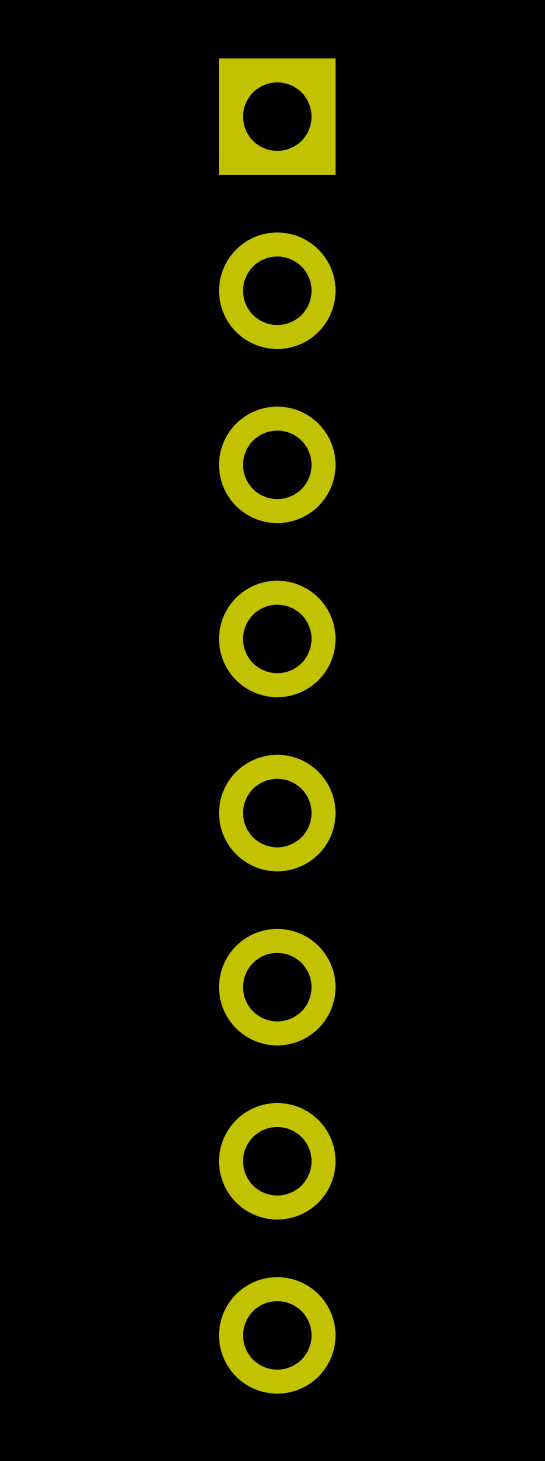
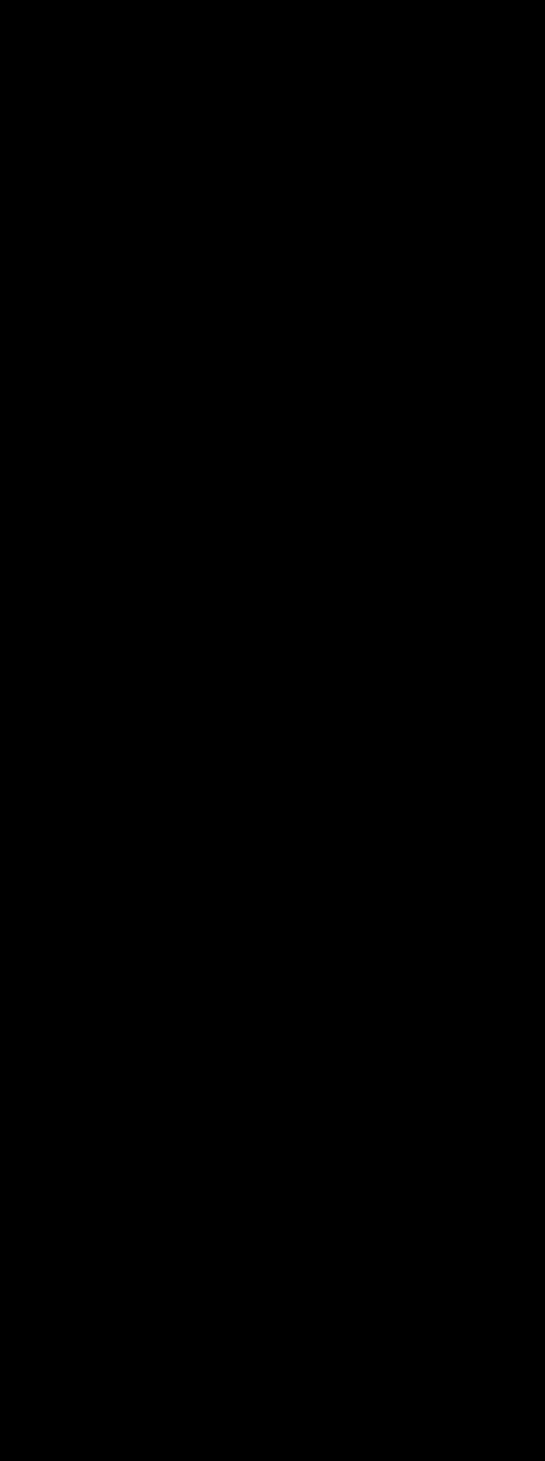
part: (277, 726) -> none

